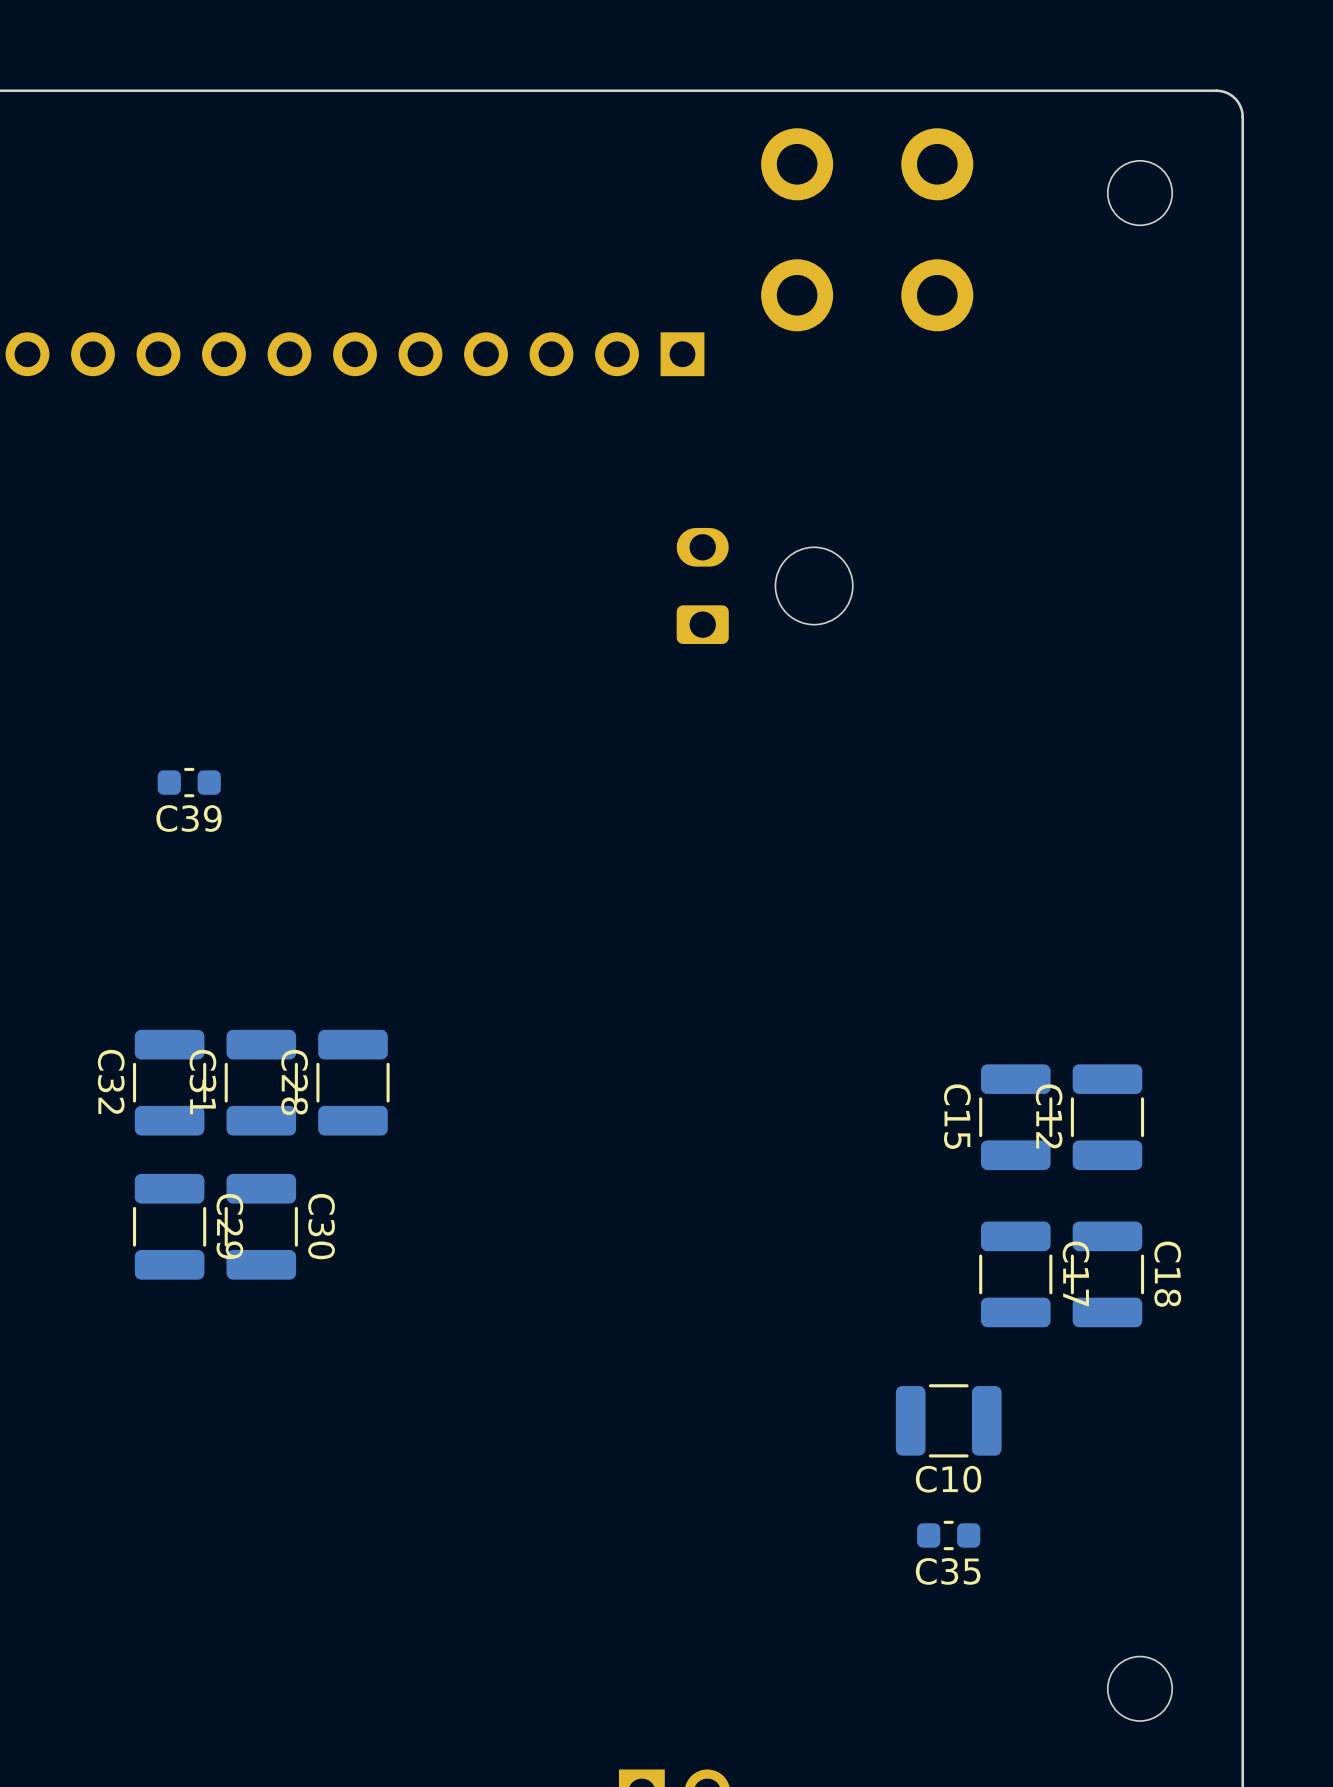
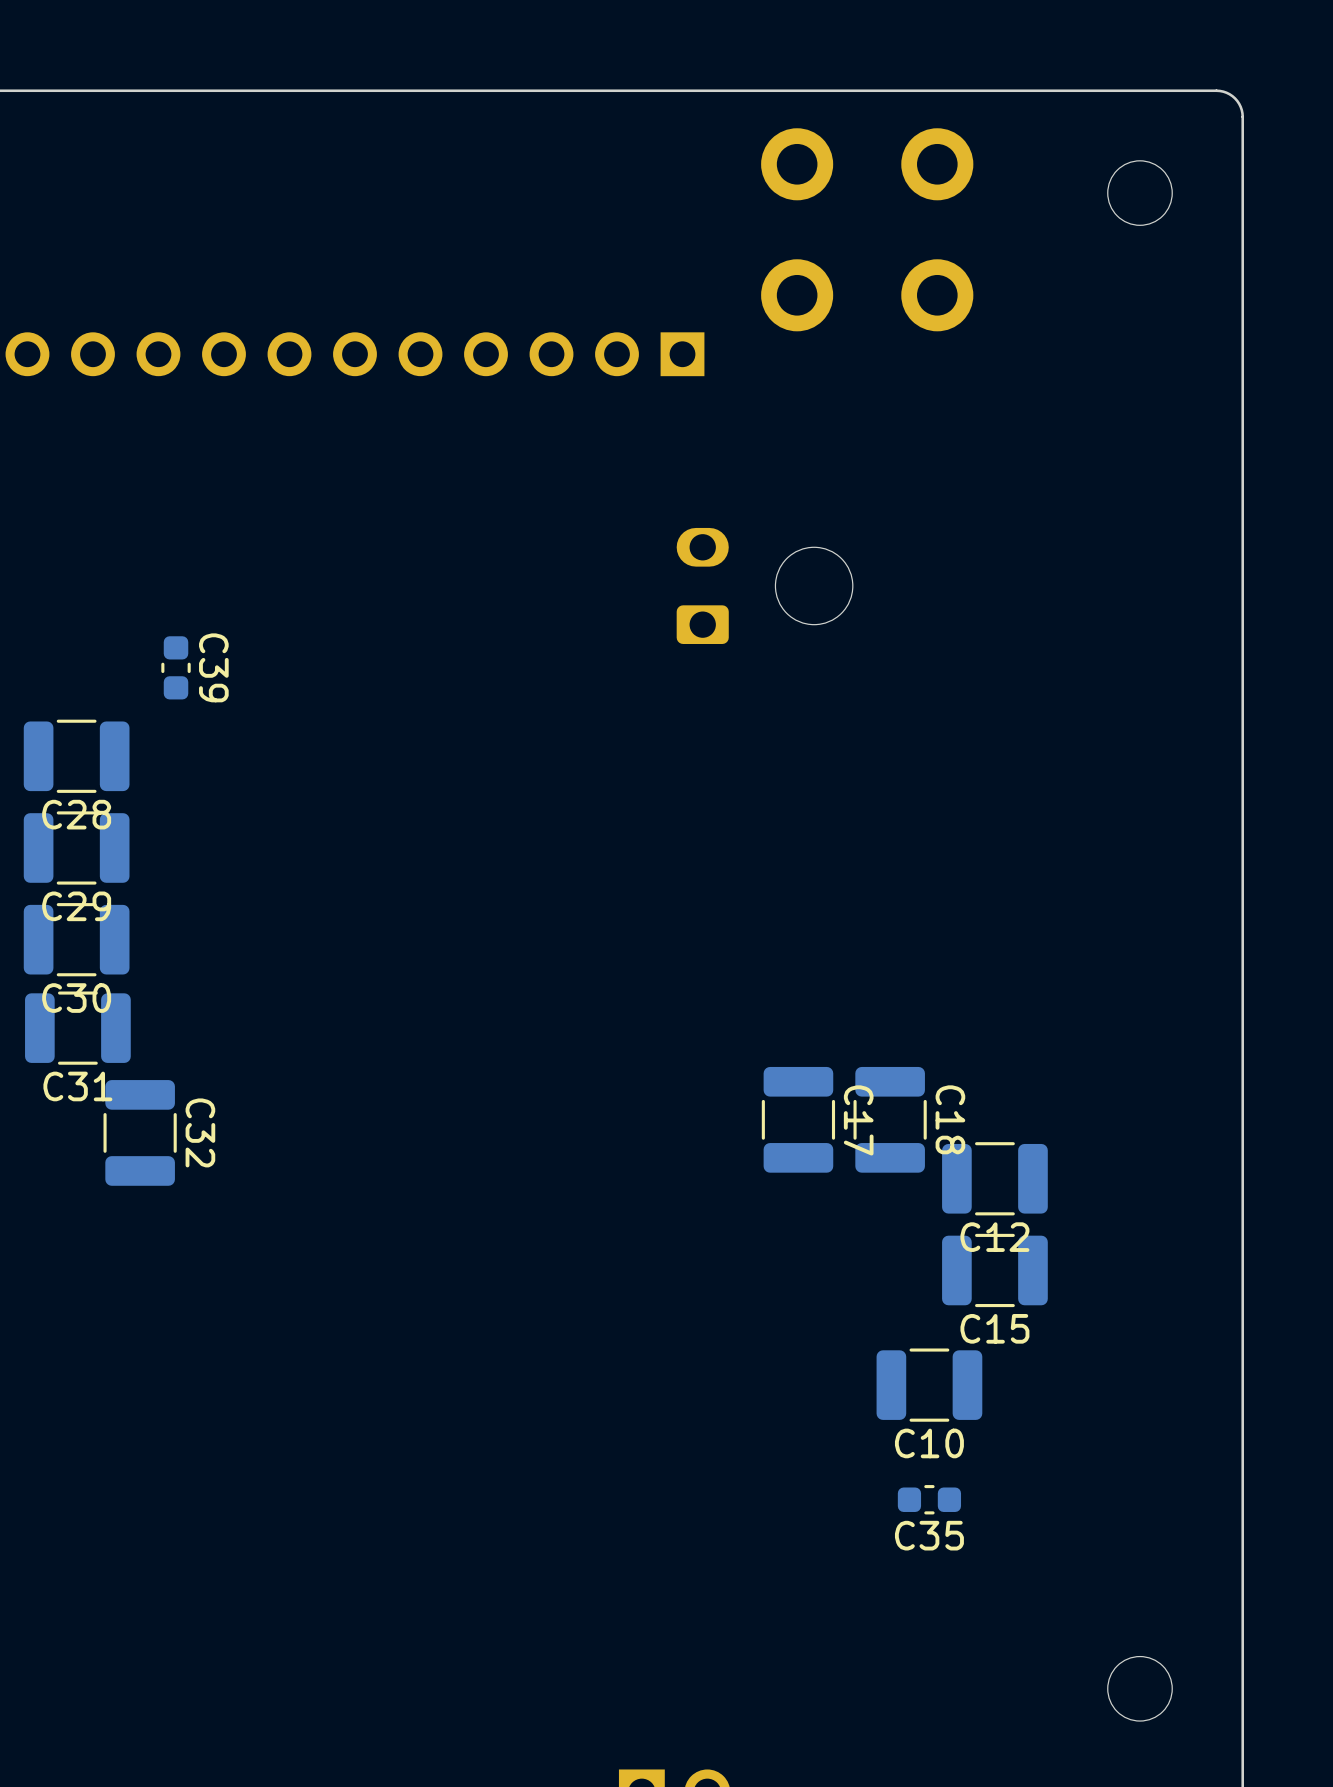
C39 rotation: 0° (189, 782) -> 90° clockwise (176, 667)
C39 position: (189, 782) -> (176, 667)
C39 name position: C39 (189, 818) -> C39 (213, 667)
C32 name position: C32 (111, 1081) -> C32 (200, 1132)
C32 position: (169, 1082) -> (140, 1132)
C31 name position: C31 (202, 1082) -> C31 (77, 1086)
C31 rotation: 0° (261, 1082) -> 90° clockwise (77, 1028)
C31 position: (261, 1082) -> (77, 1028)
C28 name position: C28 (294, 1082) -> C28 (76, 814)
C28 rotation: 0° (353, 1082) -> 90° clockwise (76, 756)
C28 position: (353, 1082) -> (76, 756)
C15 name position: C15 (957, 1116) -> C15 (994, 1328)
C12 name position: C12 (1049, 1116) -> C12 (994, 1237)
C15 rotation: 0° (1015, 1117) -> 90° clockwise (994, 1270)
C15 position: (1015, 1117) -> (994, 1270)
C12 rotation: 0° (1107, 1117) -> 90° clockwise (994, 1178)
C12 position: (1107, 1117) -> (994, 1178)
C29 rotation: 0° (169, 1226) -> 90° clockwise (76, 847)
C29 position: (169, 1226) -> (76, 847)
C30 rotation: 0° (261, 1226) -> 90° clockwise (76, 939)
C30 position: (261, 1226) -> (76, 939)
C17 position: (1015, 1274) -> (798, 1119)
C18 position: (1107, 1274) -> (890, 1119)
C10 position: (948, 1420) -> (929, 1385)
C35 position: (948, 1535) -> (929, 1499)

